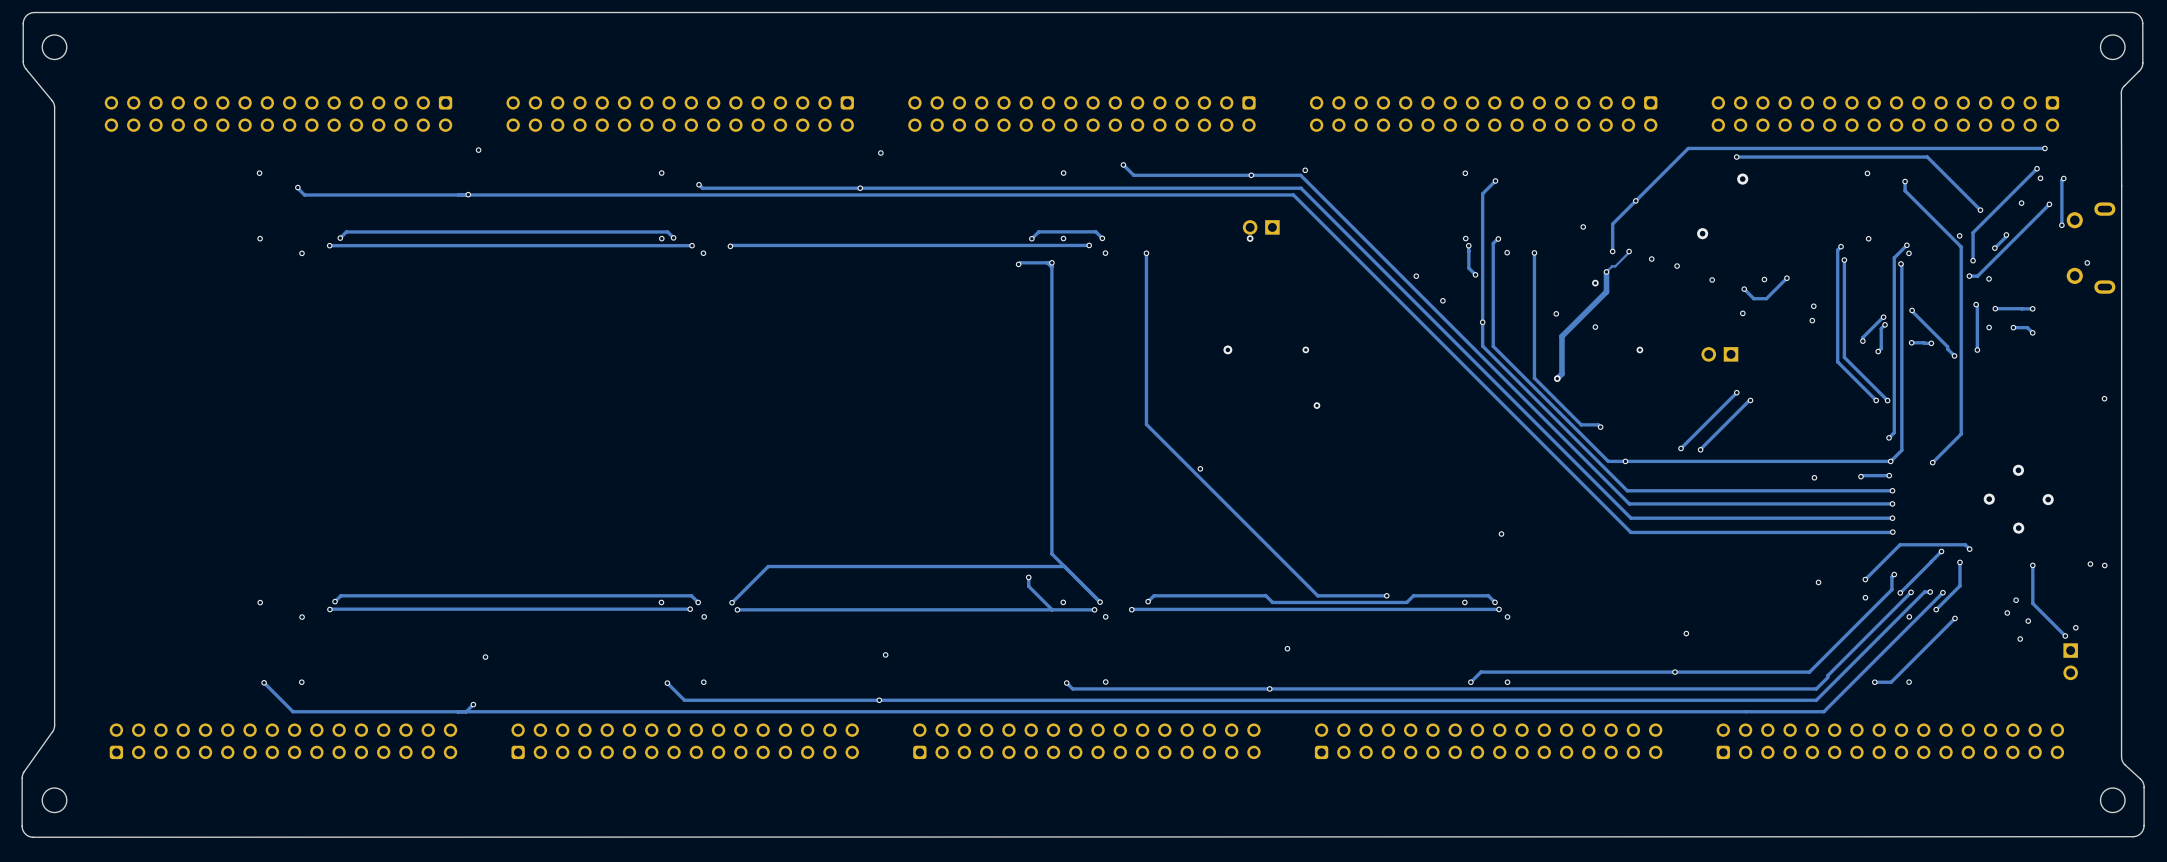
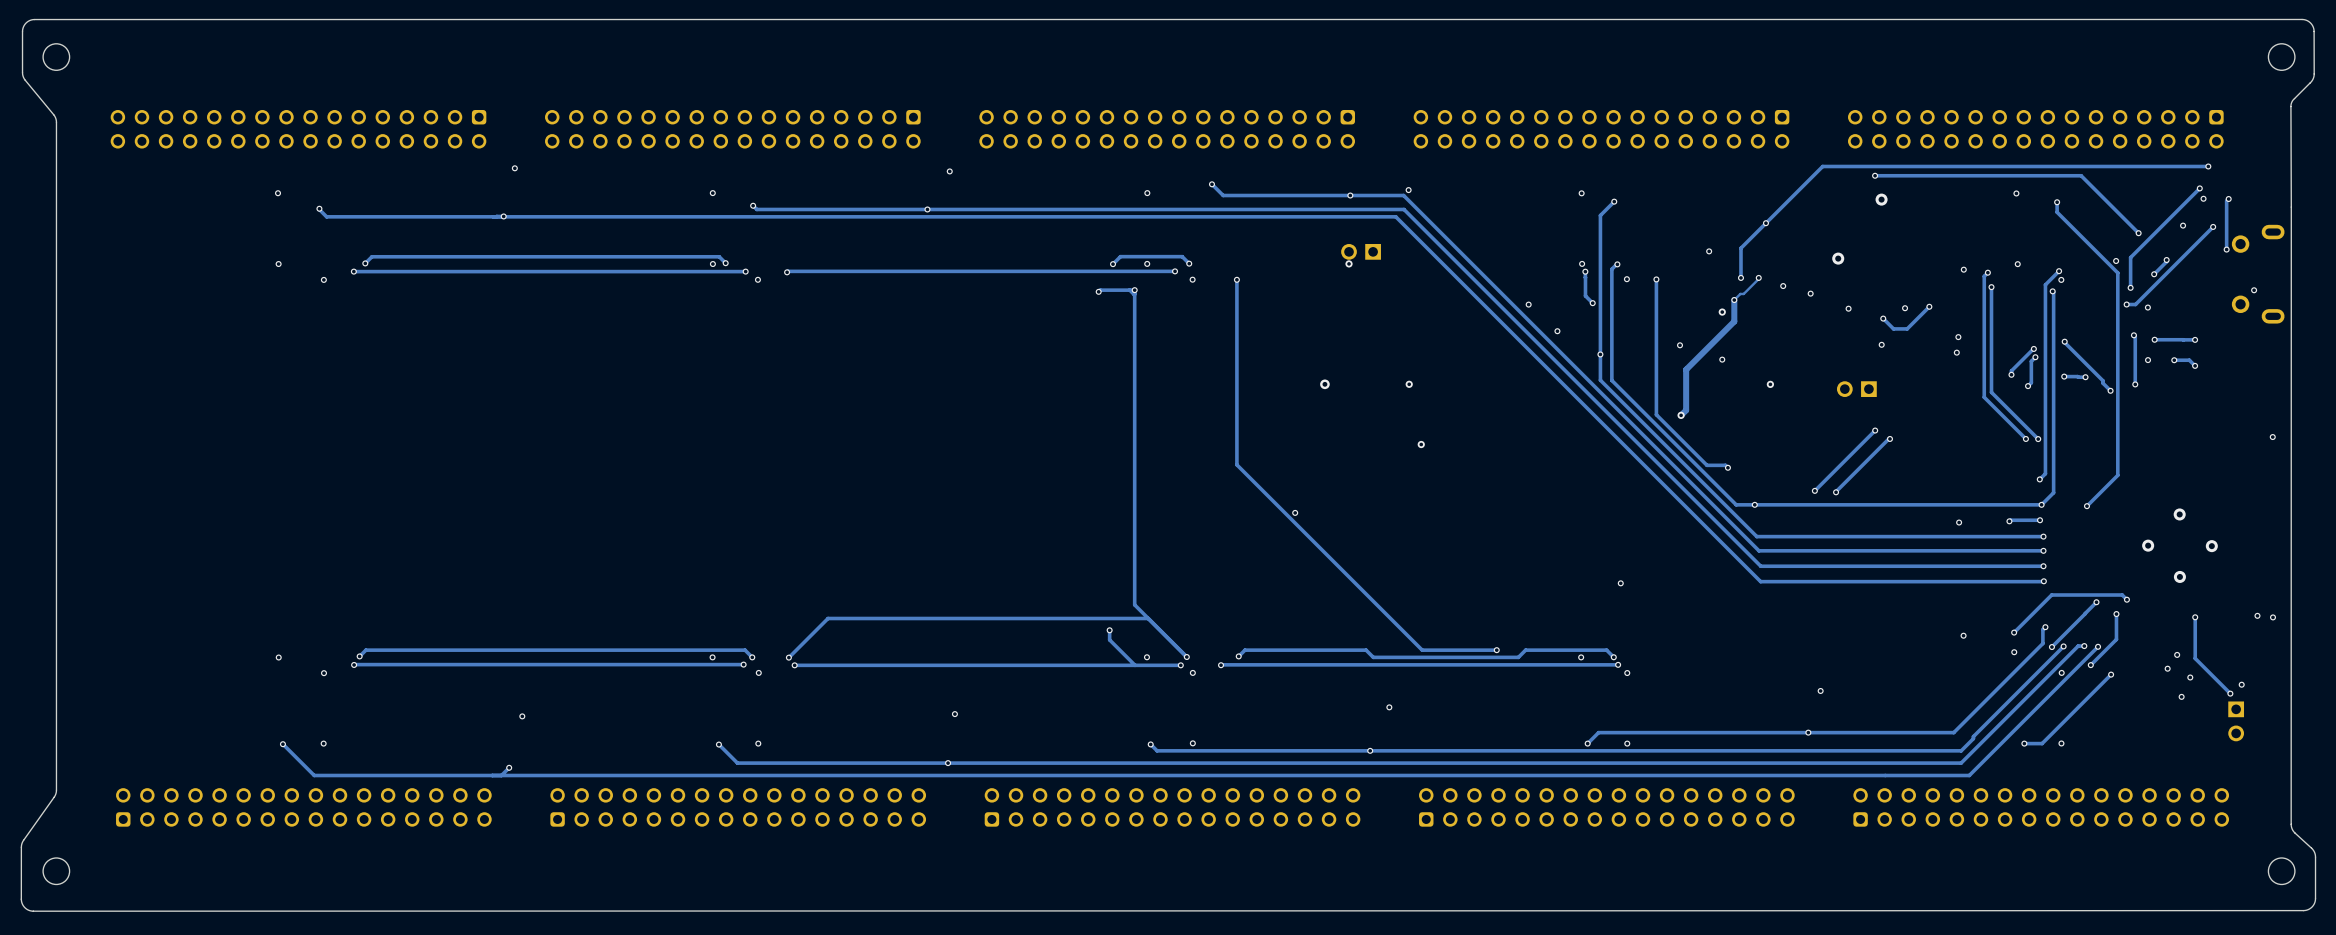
via: none -> (1963, 269)

